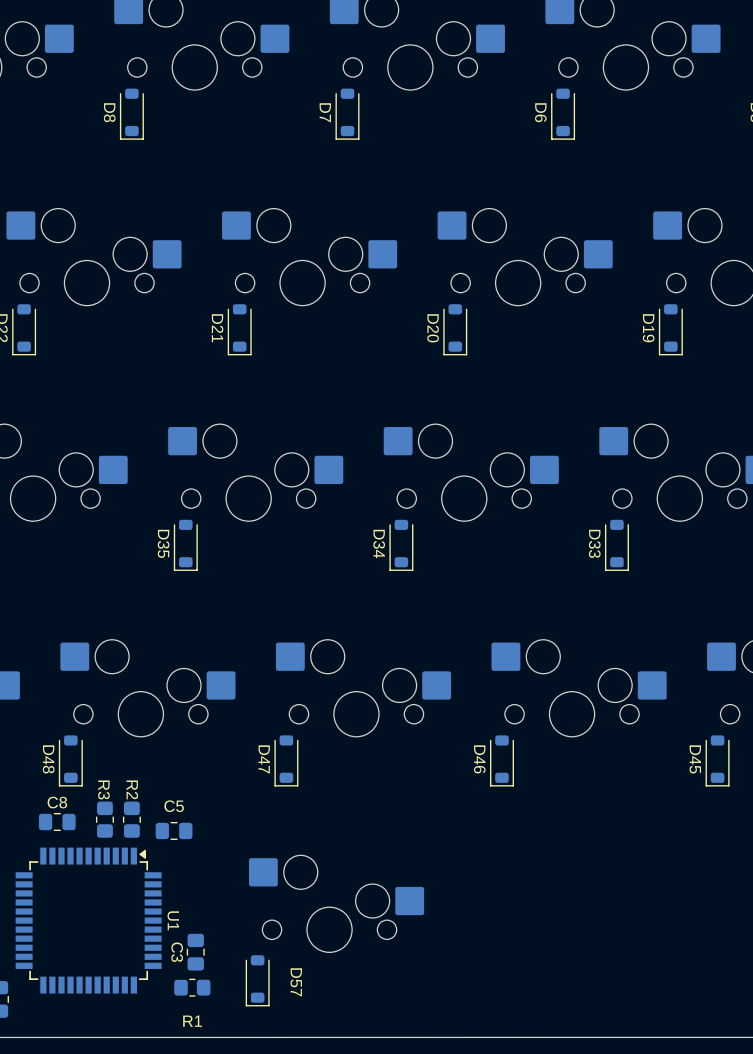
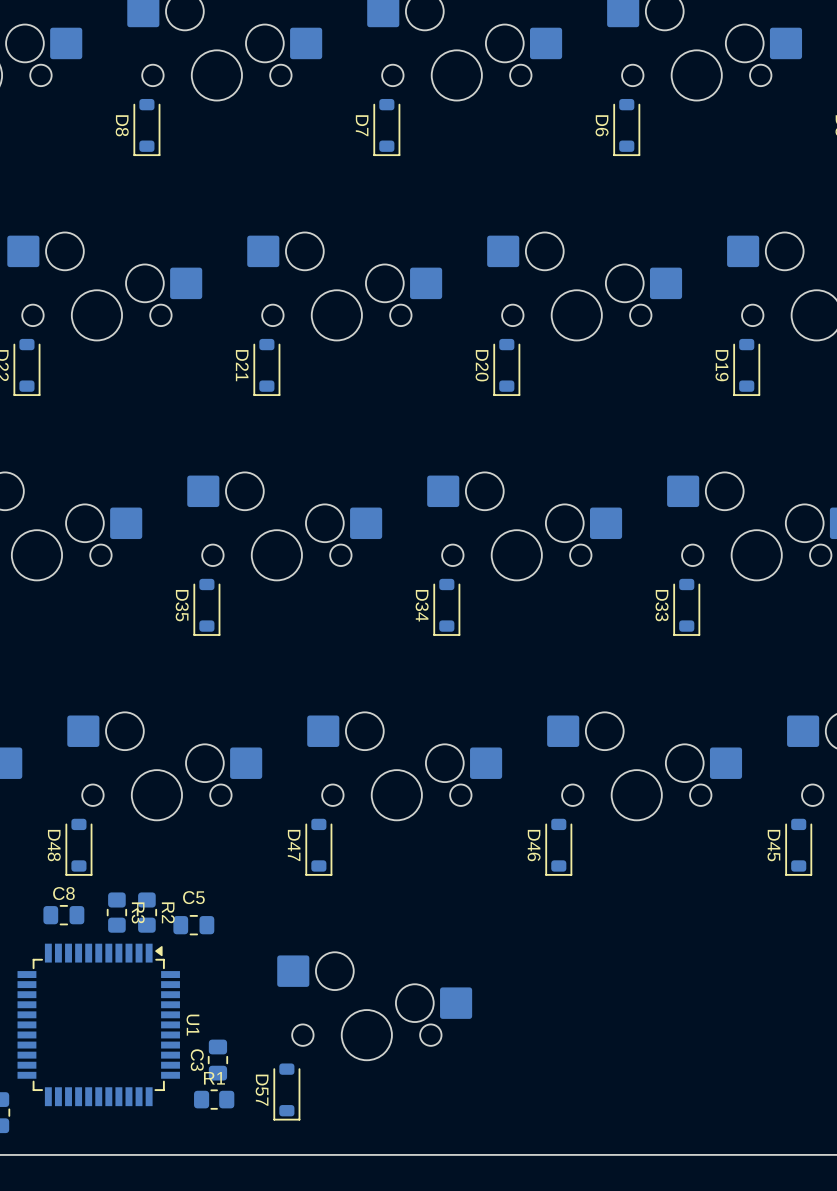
R3 name position: R3 (103, 789) -> R3 (138, 912)
R2 name position: R2 (132, 789) -> R2 (168, 912)
D57 name position: D57 (296, 982) -> D57 (262, 1090)
R1 name position: R1 (192, 1021) -> R1 (214, 1078)

